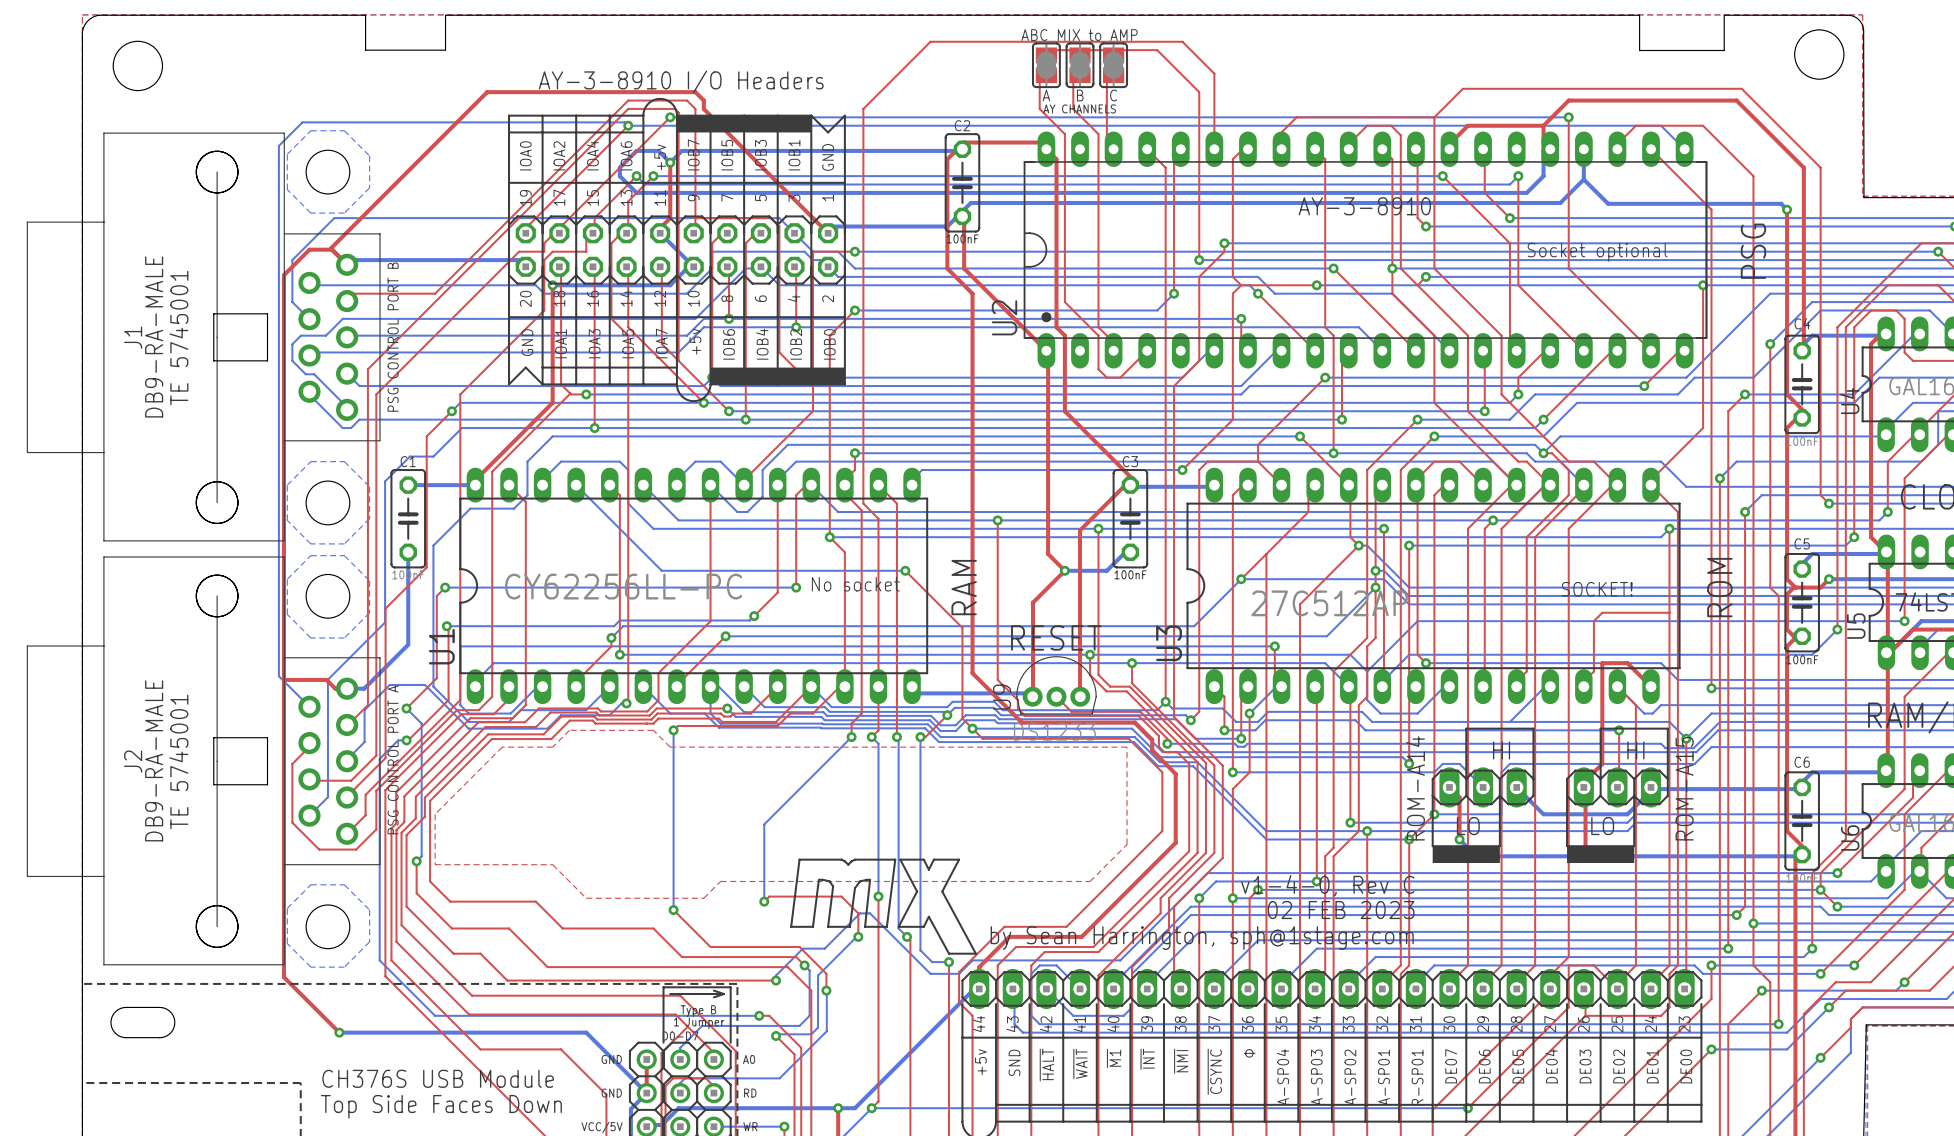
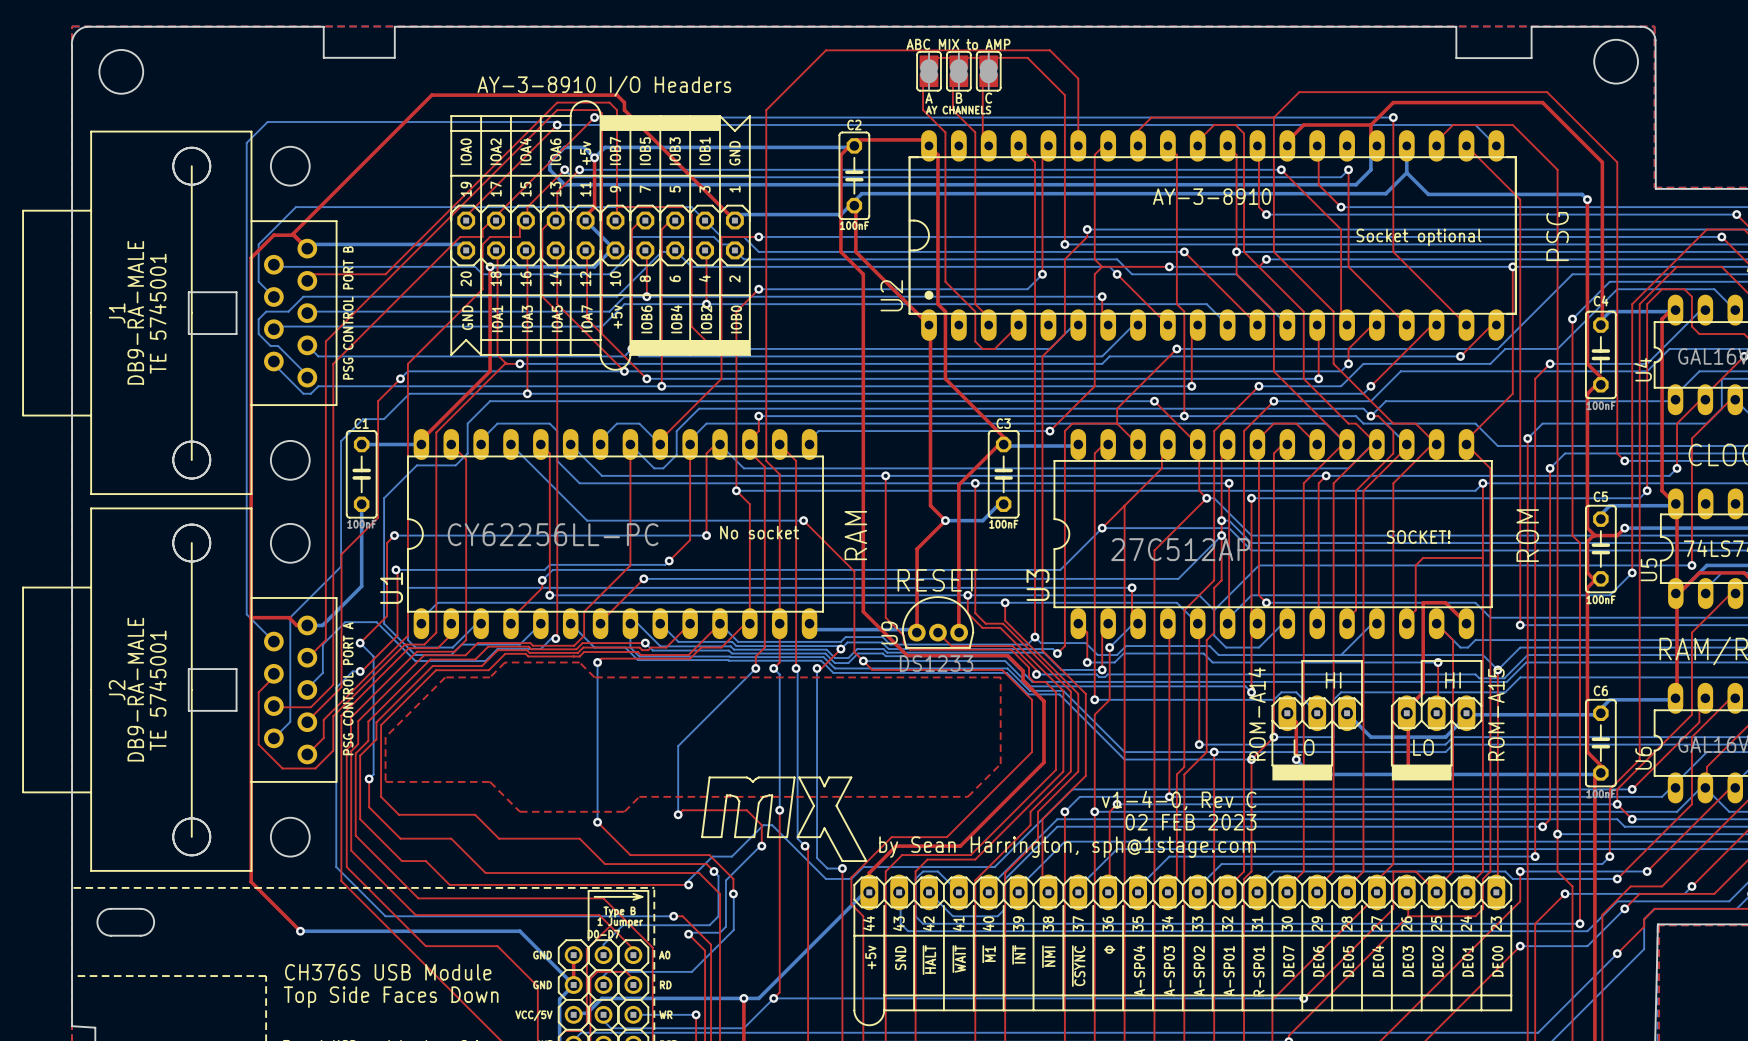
bottom zone outline: (310, 130) (344, 130) (369, 155) (369, 187) (344, 213) (310, 213) (287, 189) (287, 154) (310, 130) -> none
bottom zone outline: (310, 461) (344, 461) (369, 486) (369, 518) (344, 543) (310, 543) (287, 520) (287, 485) (310, 461) -> none
bottom zone outline: (310, 555) (344, 555) (369, 580) (369, 612) (344, 637) (310, 637) (287, 614) (287, 579) (310, 555) -> none
bottom zone outline: (310, 884) (344, 884) (369, 910) (369, 941) (344, 967) (310, 967) (287, 943) (287, 908) (310, 884) -> none

